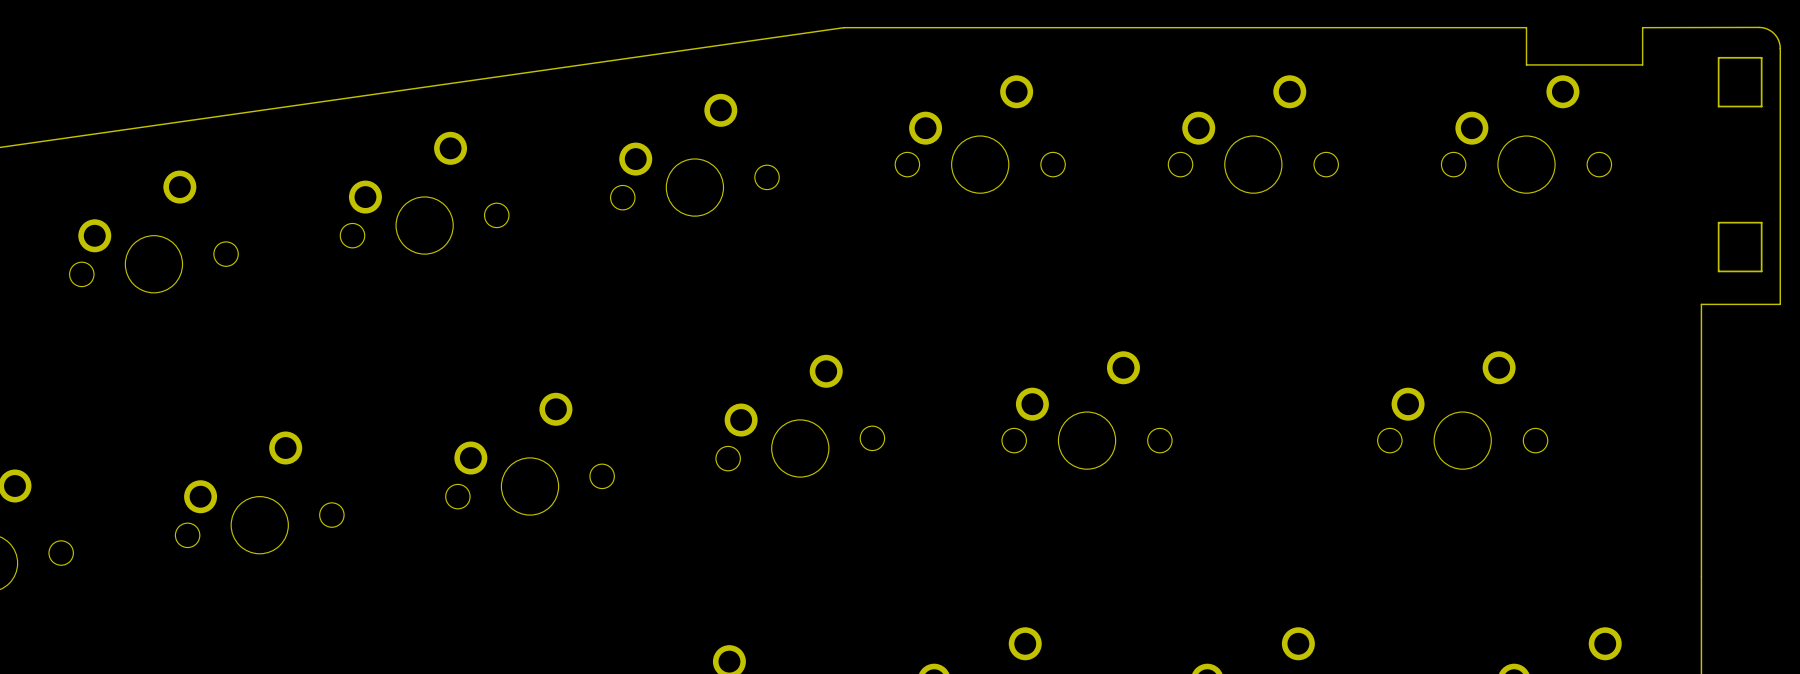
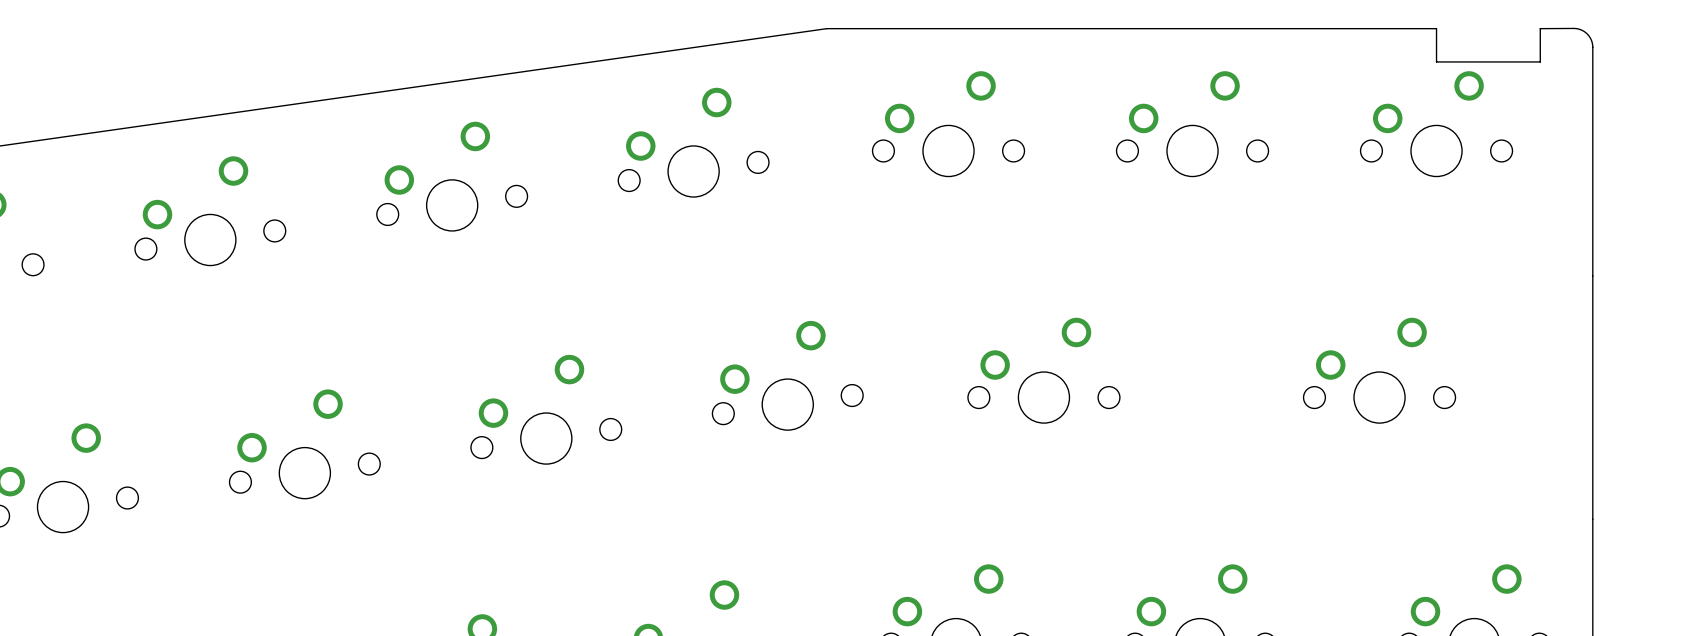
board edge: (1642, 27) (1761, 27) (1772, 32) (1779, 43) (1780, 304) (1701, 304) -> (1540, 28) (1578, 28) (1587, 33) (1592, 43) (1592, 275)
part: (1740, 82) -> none
part: (1740, 247) -> none

